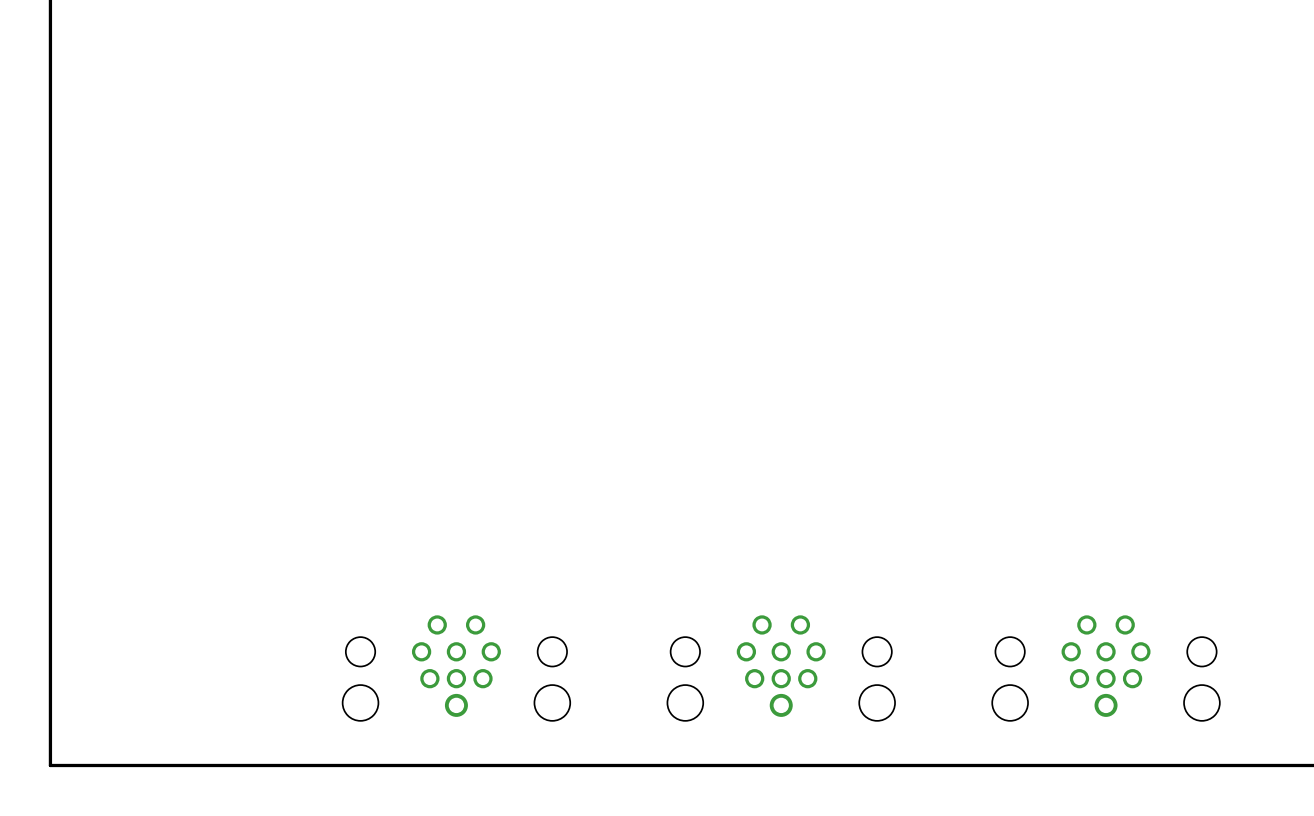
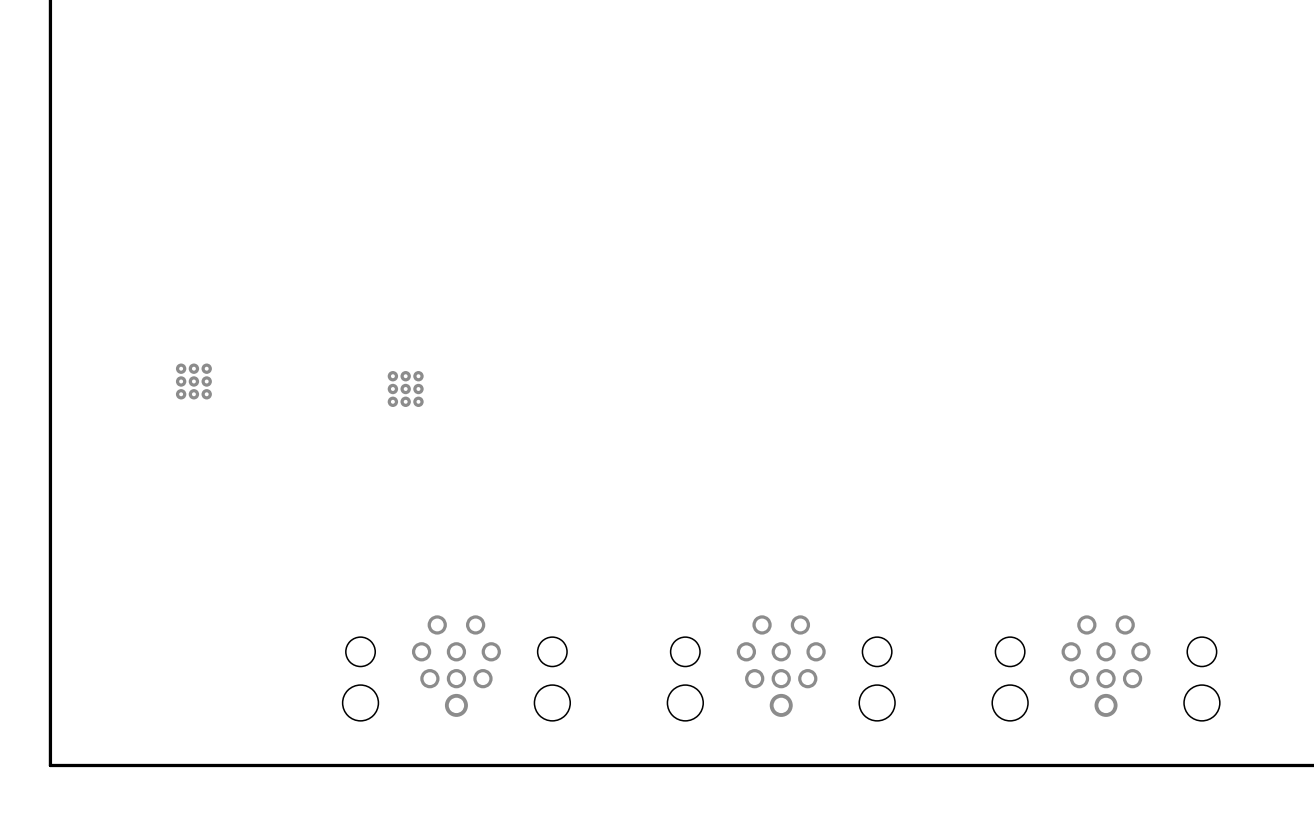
part: none -> (193, 381)
part: none -> (405, 389)

